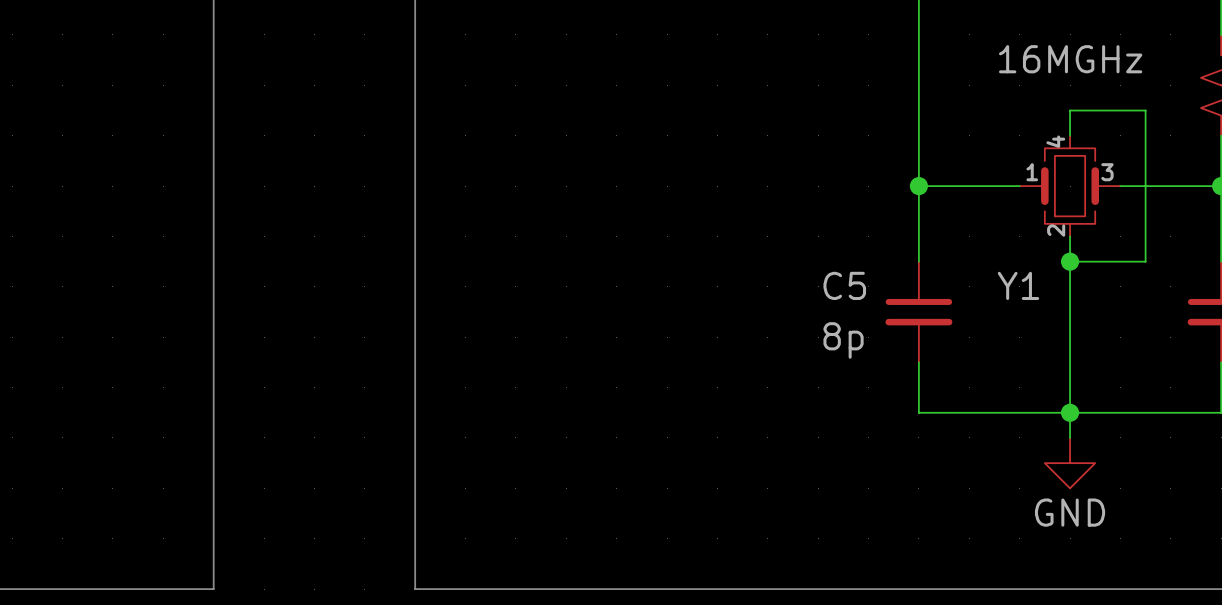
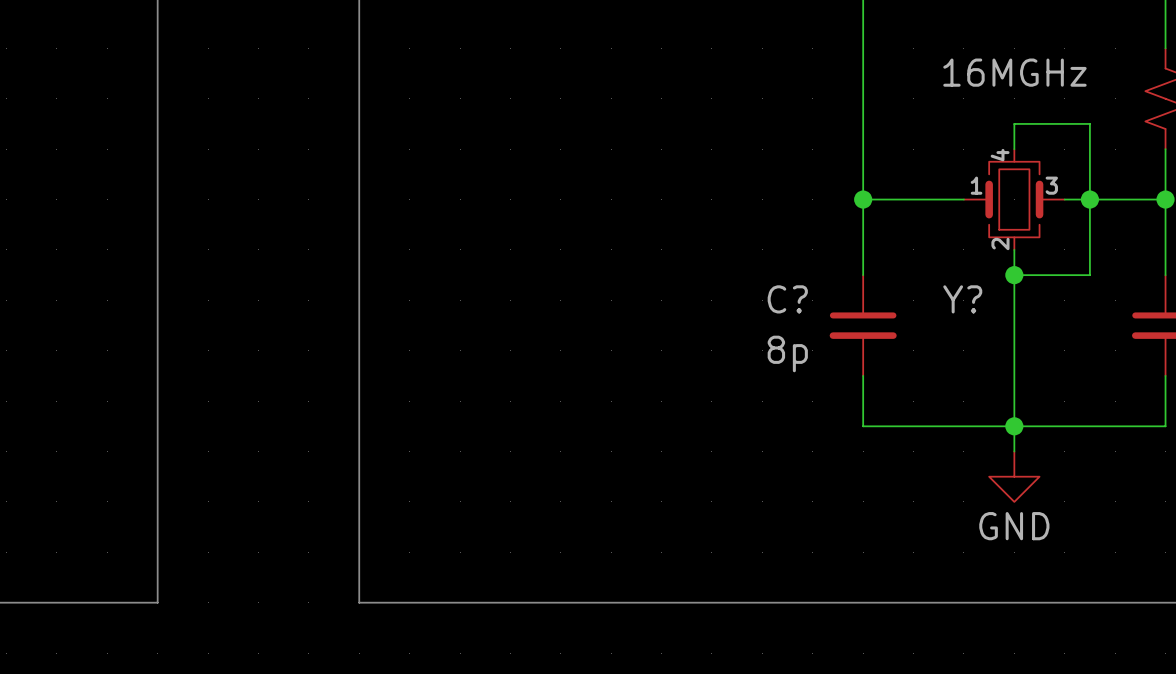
junction: none -> (1089, 199)
C5 name: C5 (844, 285) -> C? (787, 299)
Y1 name: Y1 (1018, 285) -> Y? (962, 299)

